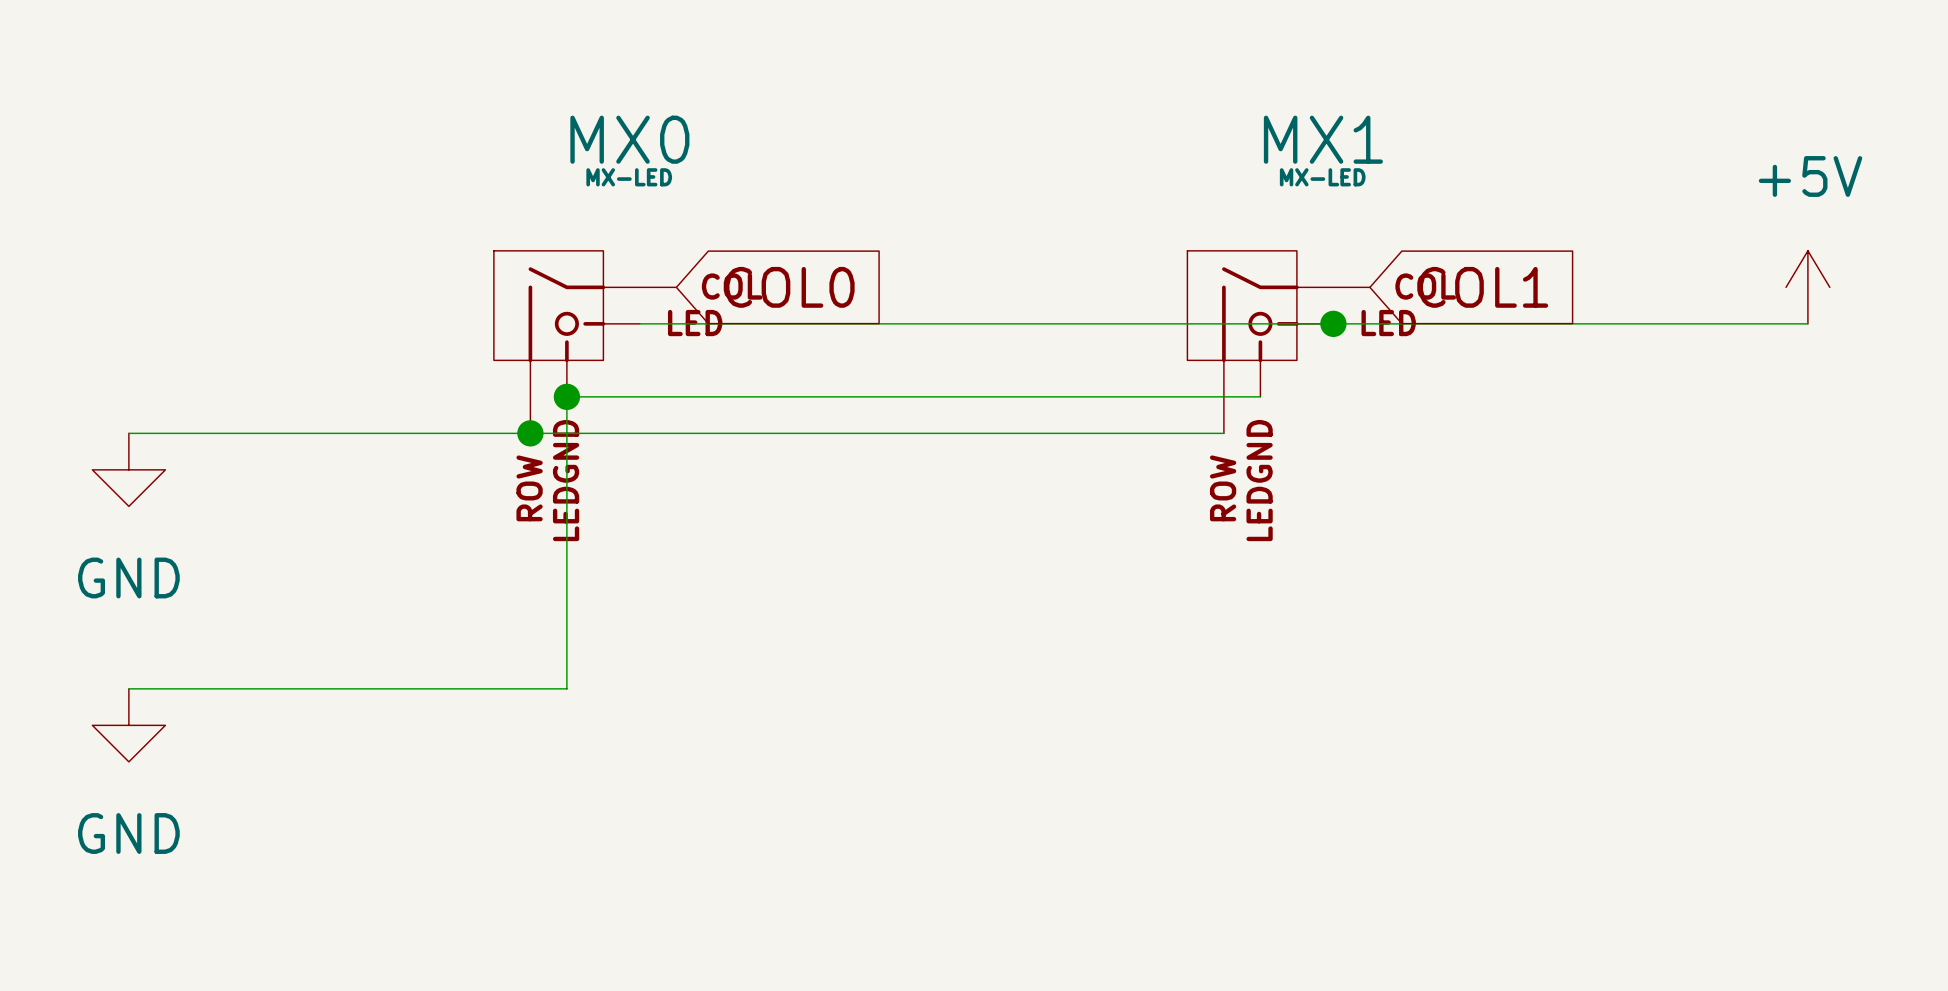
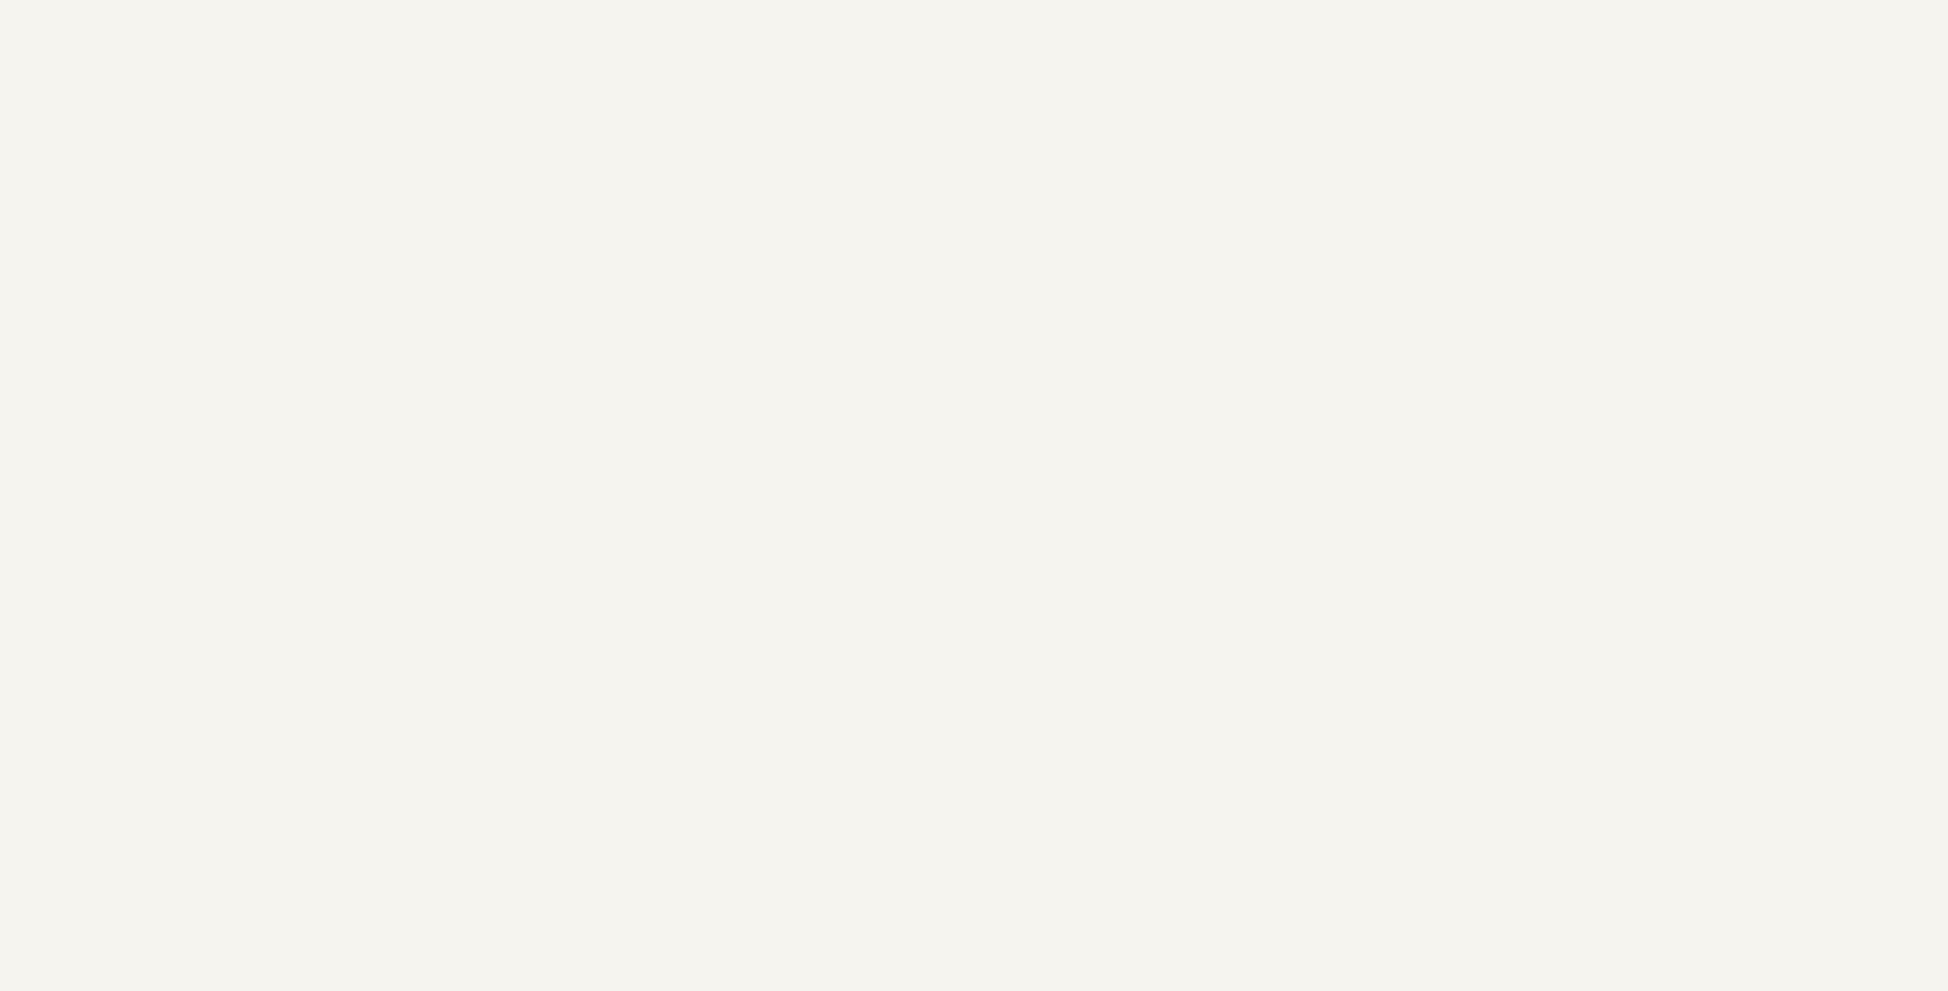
global label: COL0 (789, 287) -> none
global label: COL1 (1483, 287) -> none
power symbol: +5V (1807, 287) -> none
wire: (639, 323) (1807, 323) -> none
junction: (1333, 323) -> none
MX0: MX-LED (585, 342) -> none
MX1: MX-LED (1278, 342) -> none
junction: (566, 396) -> none
wire: (1260, 396) (566, 396) (566, 688) (128, 688) -> none
wire: (128, 433) (1223, 433) -> none
junction: (530, 433) -> none
power symbol: GND (128, 469) -> none
power symbol: GND (128, 725) -> none

